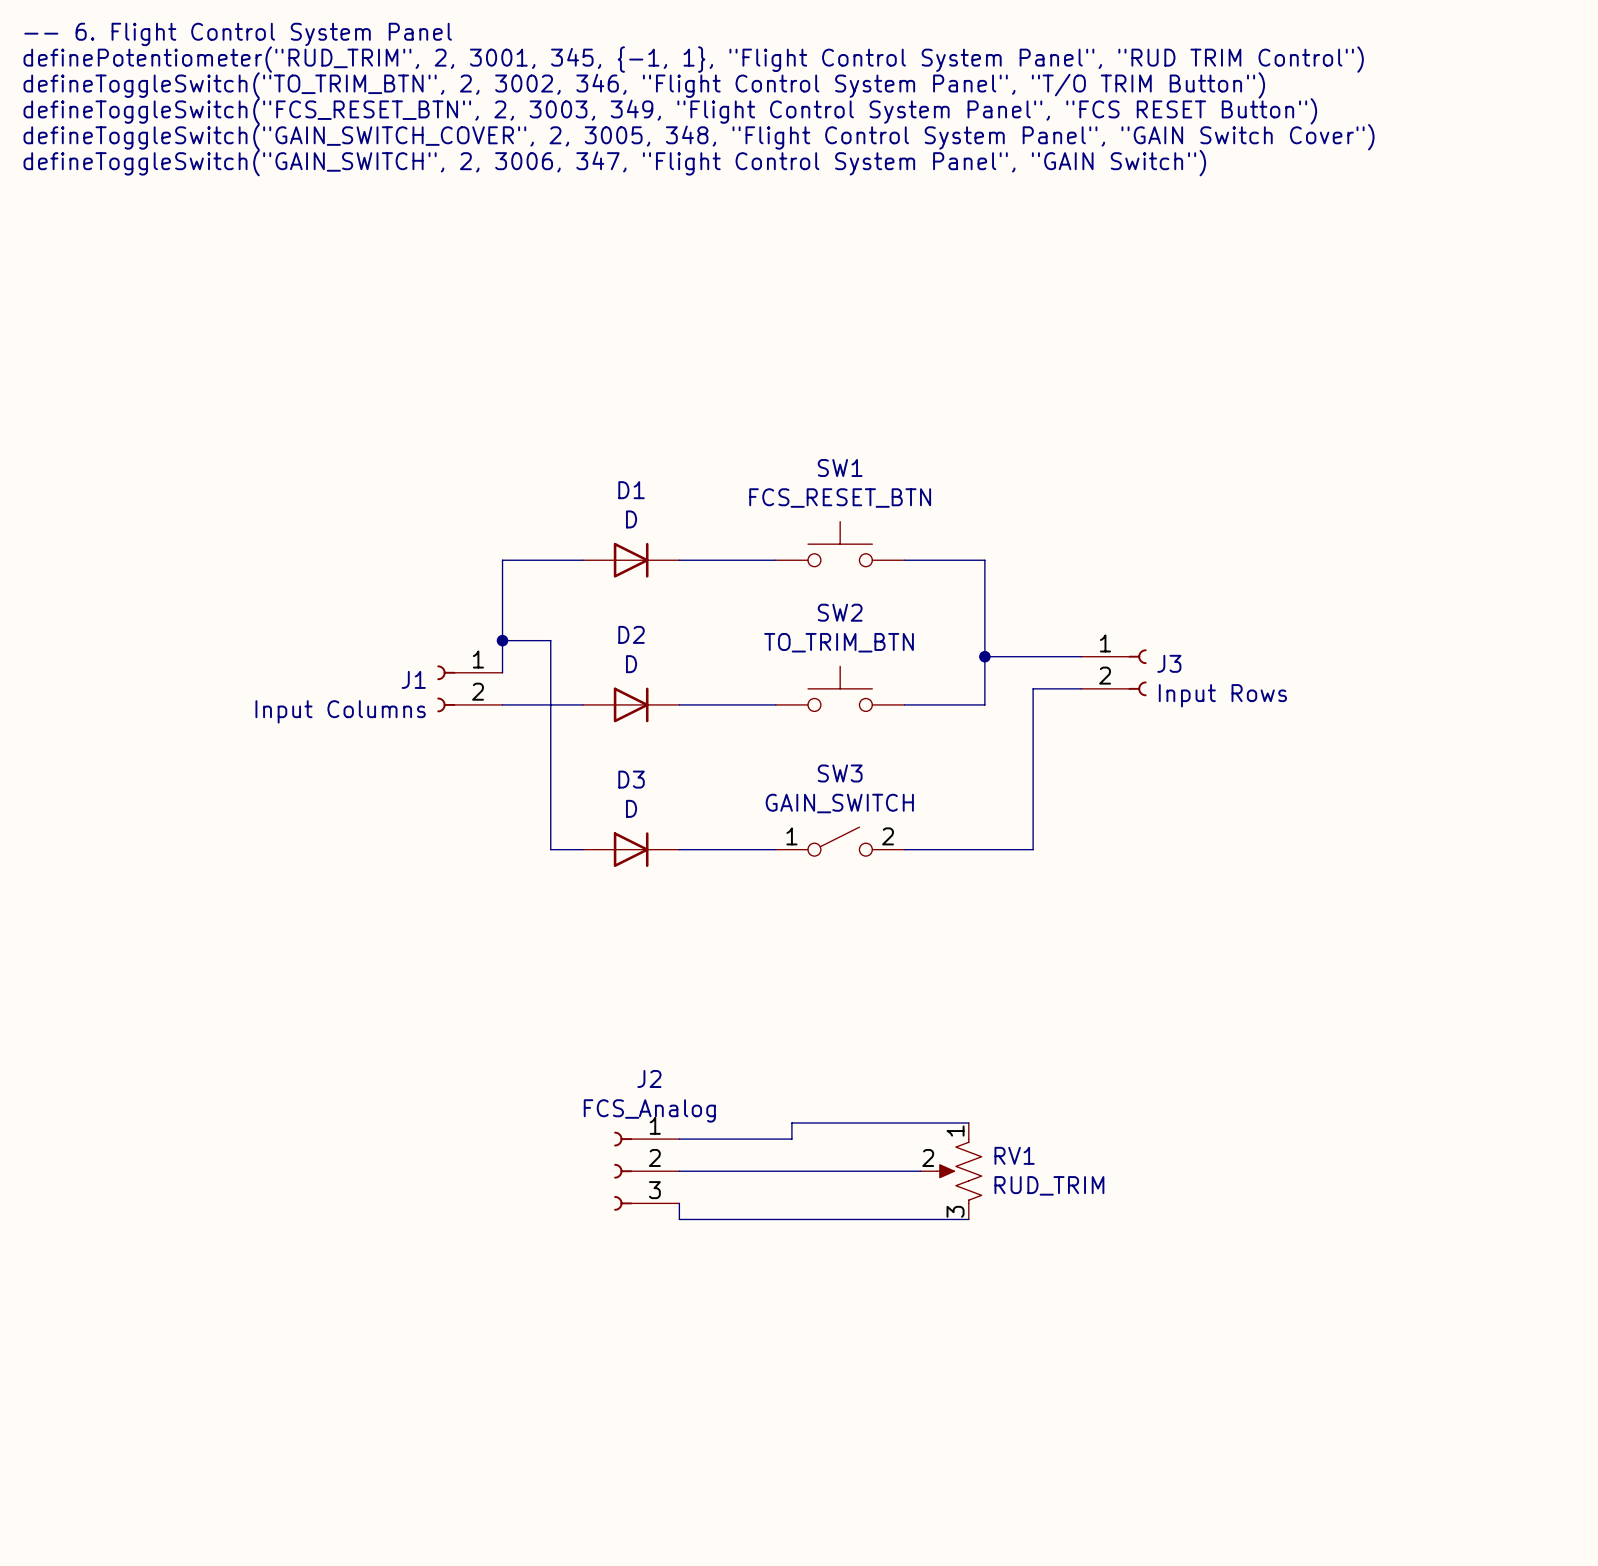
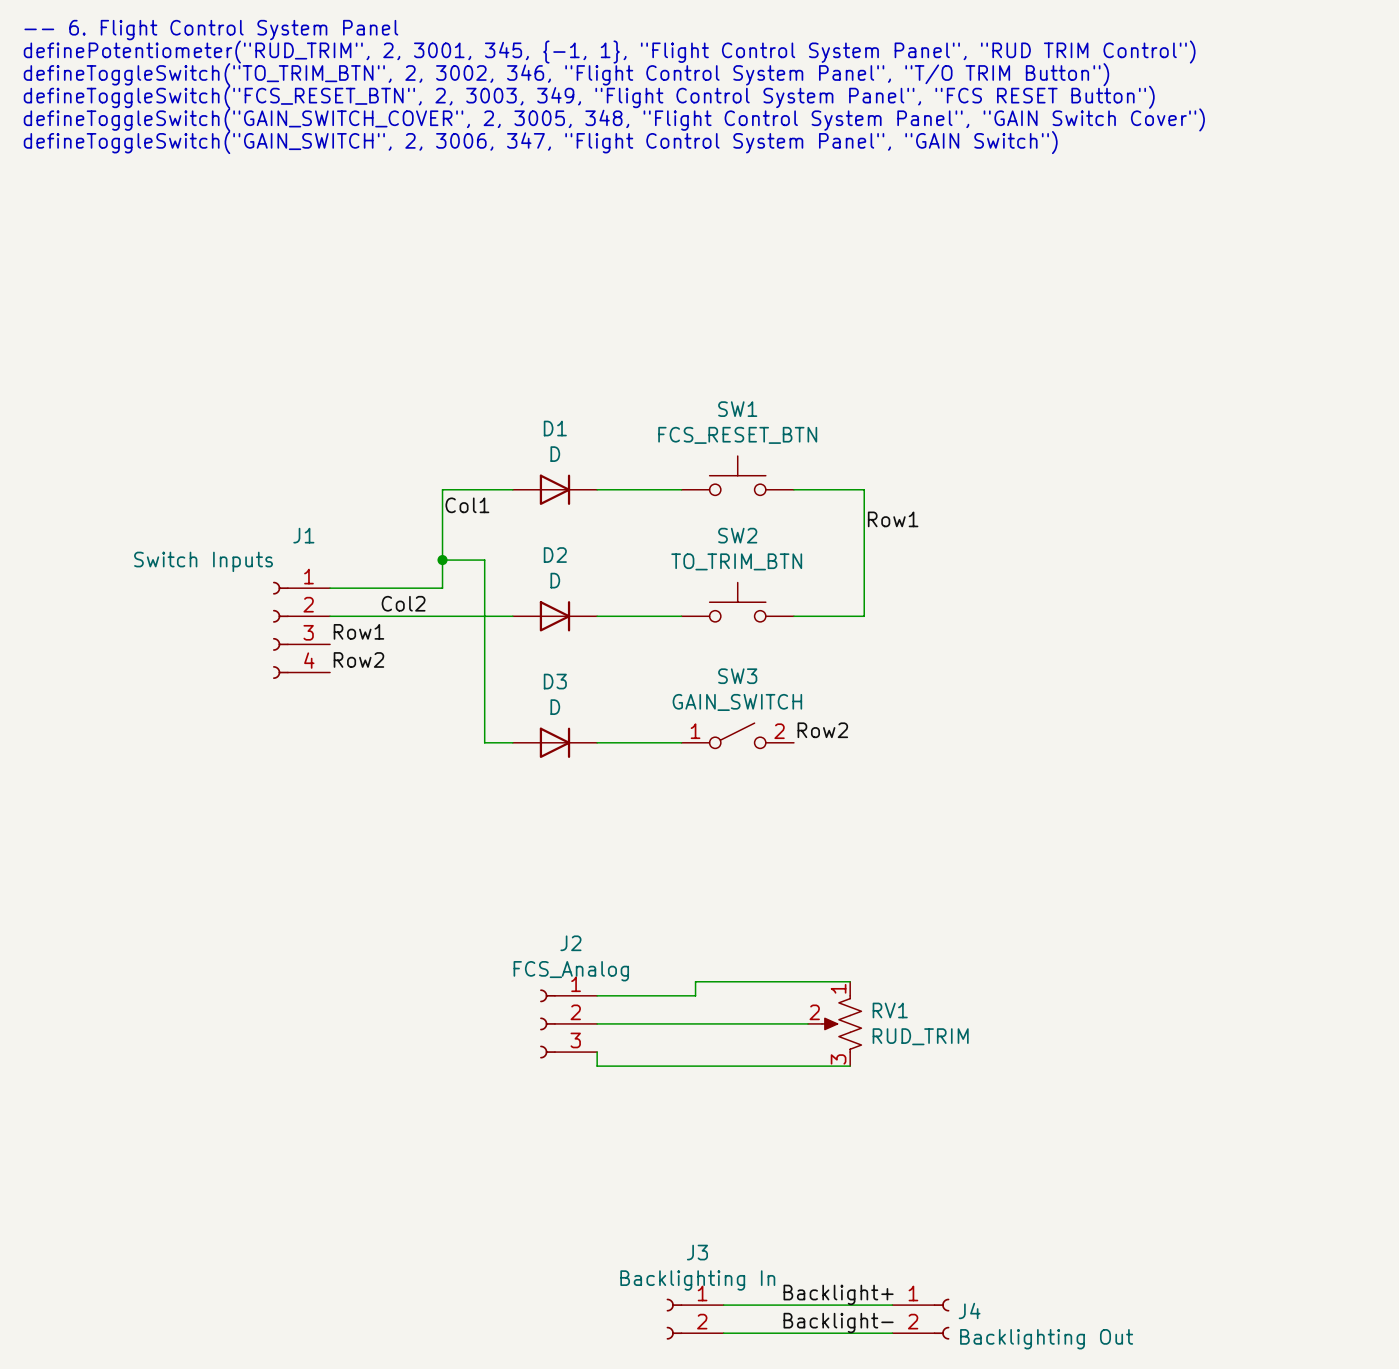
label: none -> Col1 (467, 505)
label: none -> Row1 (893, 519)
wire: (984, 656) (1081, 656) -> none
junction: (984, 656) -> none
J3 name position: J3 (1169, 663) -> J3 (697, 1252)
J1 symbol: [437, 665, 503, 713] -> [273, 581, 331, 679]
wire: none -> (330, 588) (442, 588)
J3 position: (1113, 672) -> (695, 1319)
J3 flip: as is (1137, 672) -> left-right (674, 1319)
J1 name position: J1 (413, 679) -> J1 (303, 535)
wire: (1081, 688) (1033, 688) (1033, 849) (904, 849) -> none
label: none -> Col2 (403, 603)
J3 value: Input Rows (1222, 695) -> Backlighting In (697, 1280)
wire: none -> (330, 616) (442, 616)
J1 value: Input Columns (340, 711) -> Switch Inputs (203, 561)
label: none -> Row1 (358, 631)
label: none -> Row2 (358, 659)
label: none -> Row2 (822, 730)
label: none -> Backlight+ (838, 1294)
wire: none -> (723, 1305) (892, 1305)
J4: none -> Backlighting Out (920, 1319)
label: none -> Backlight- (838, 1323)
wire: none -> (723, 1333) (892, 1333)

